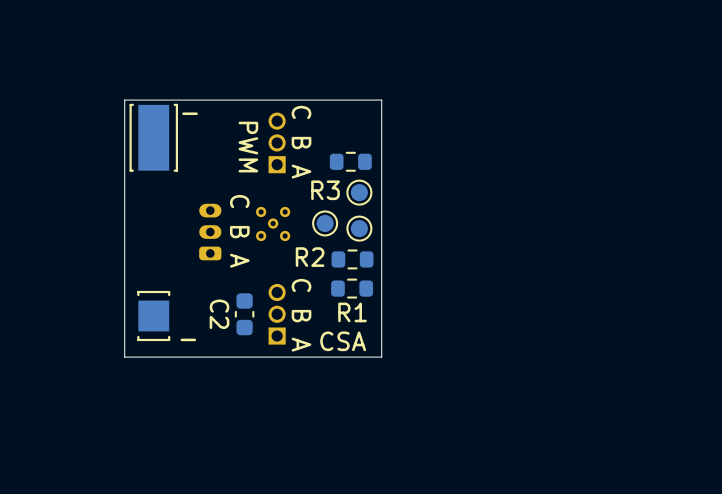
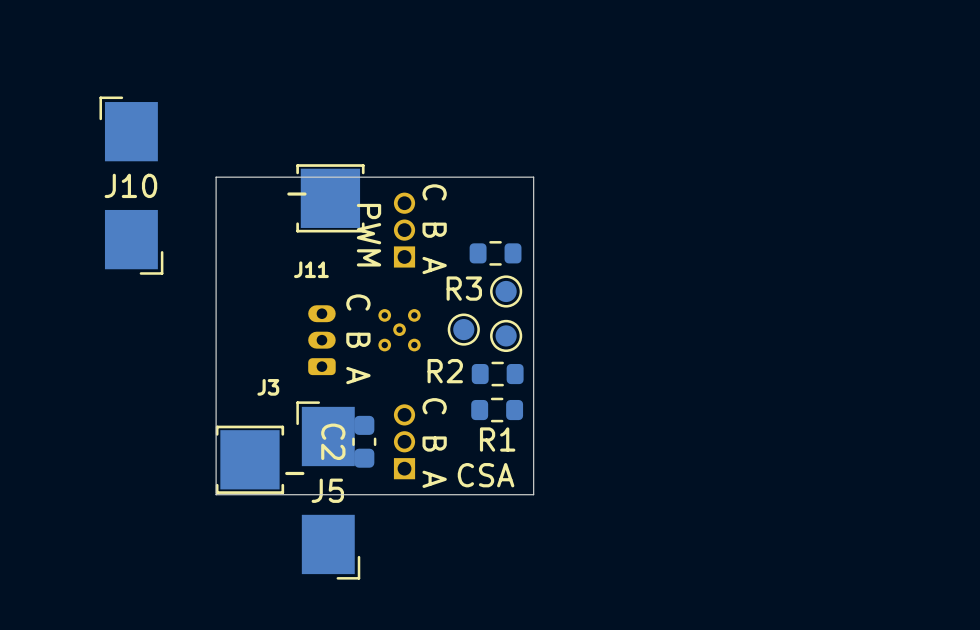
J10: none -> (131, 185)
J11: none -> (330, 198)
part: (153, 137) -> none
part: (153, 315) -> none
J3: none -> (249, 459)
J5: none -> (328, 490)

